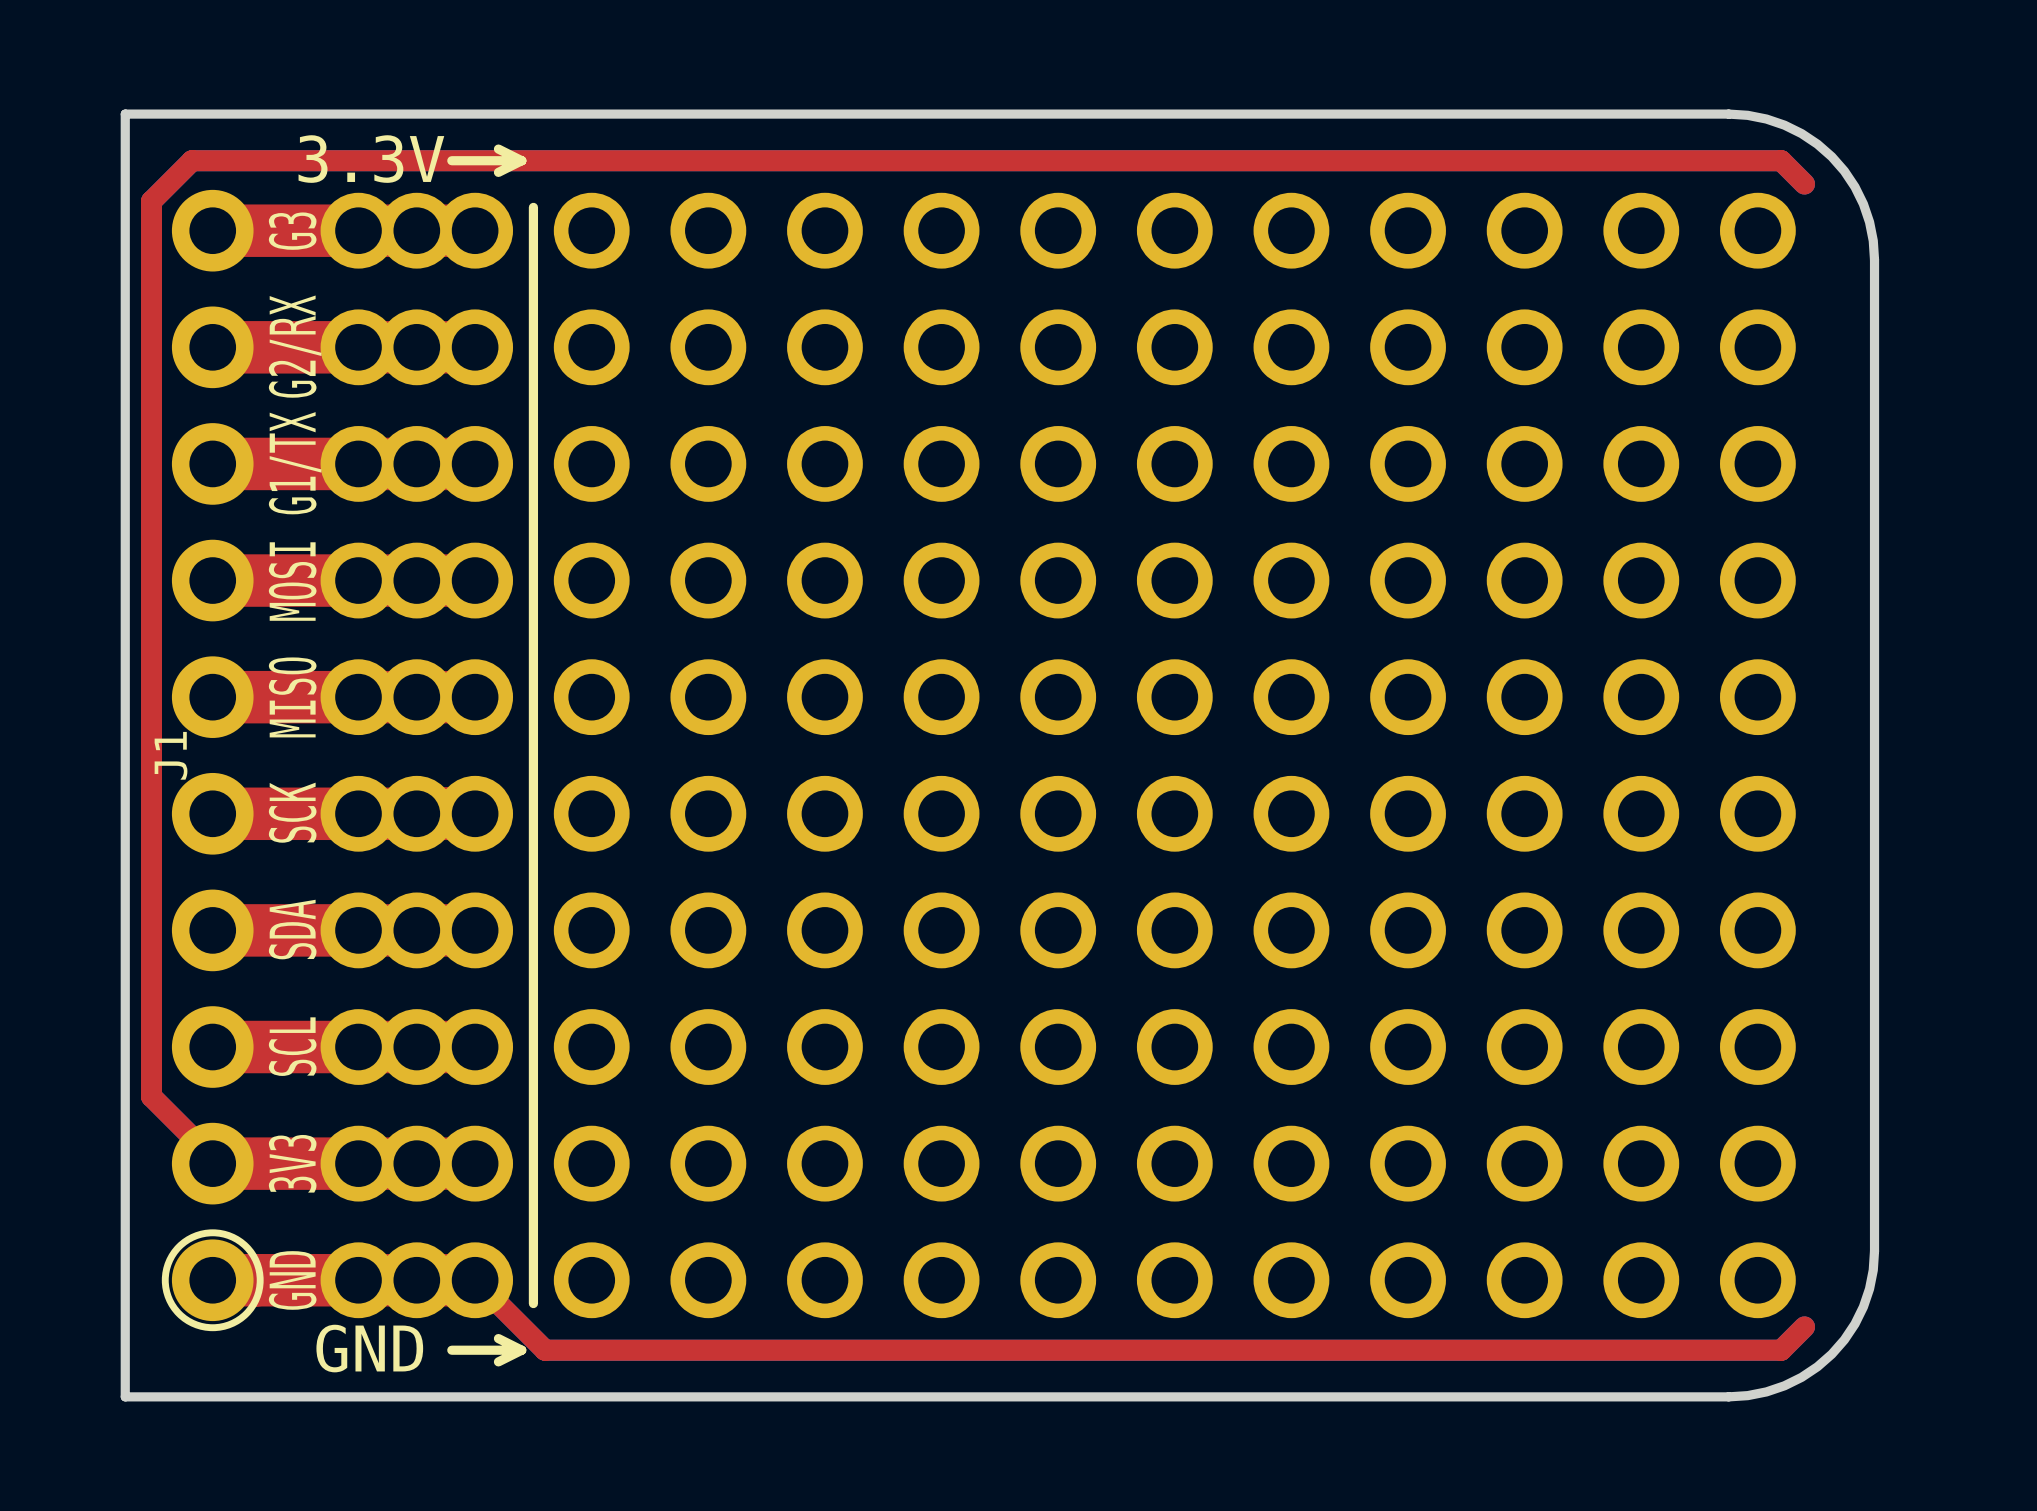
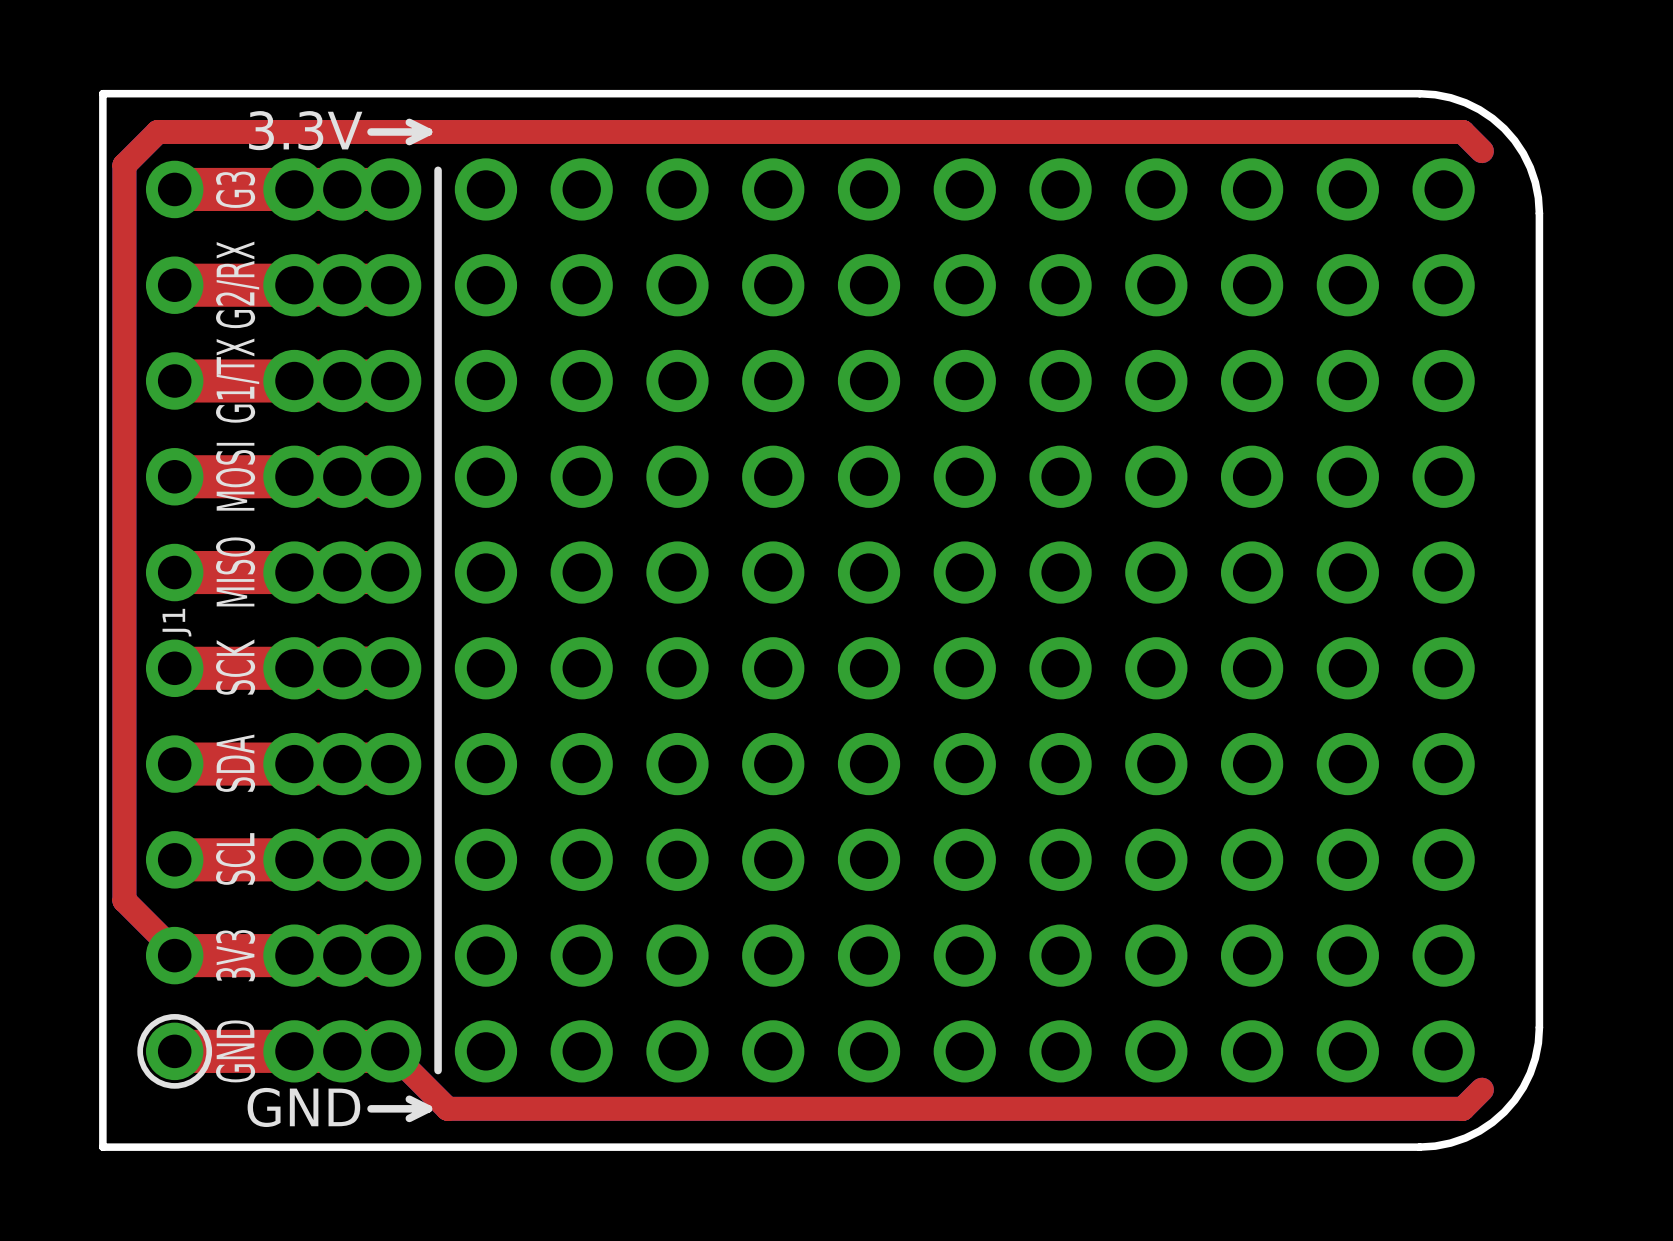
top track width: thin (1804, 184) (1781, 160) (192, 160) (151, 201) (151, 1096) (218, 1163) -> thick (1481, 151) (1462, 131) (157, 131) (124, 165) (124, 900) (179, 955)
J1 footprint: [161, 189, 264, 1332] -> [137, 160, 213, 1089]
top track width: thin (475, 1280) (545, 1350) (1781, 1350) (1804, 1326) -> thick (390, 1051) (447, 1108) (1462, 1108) (1481, 1089)

